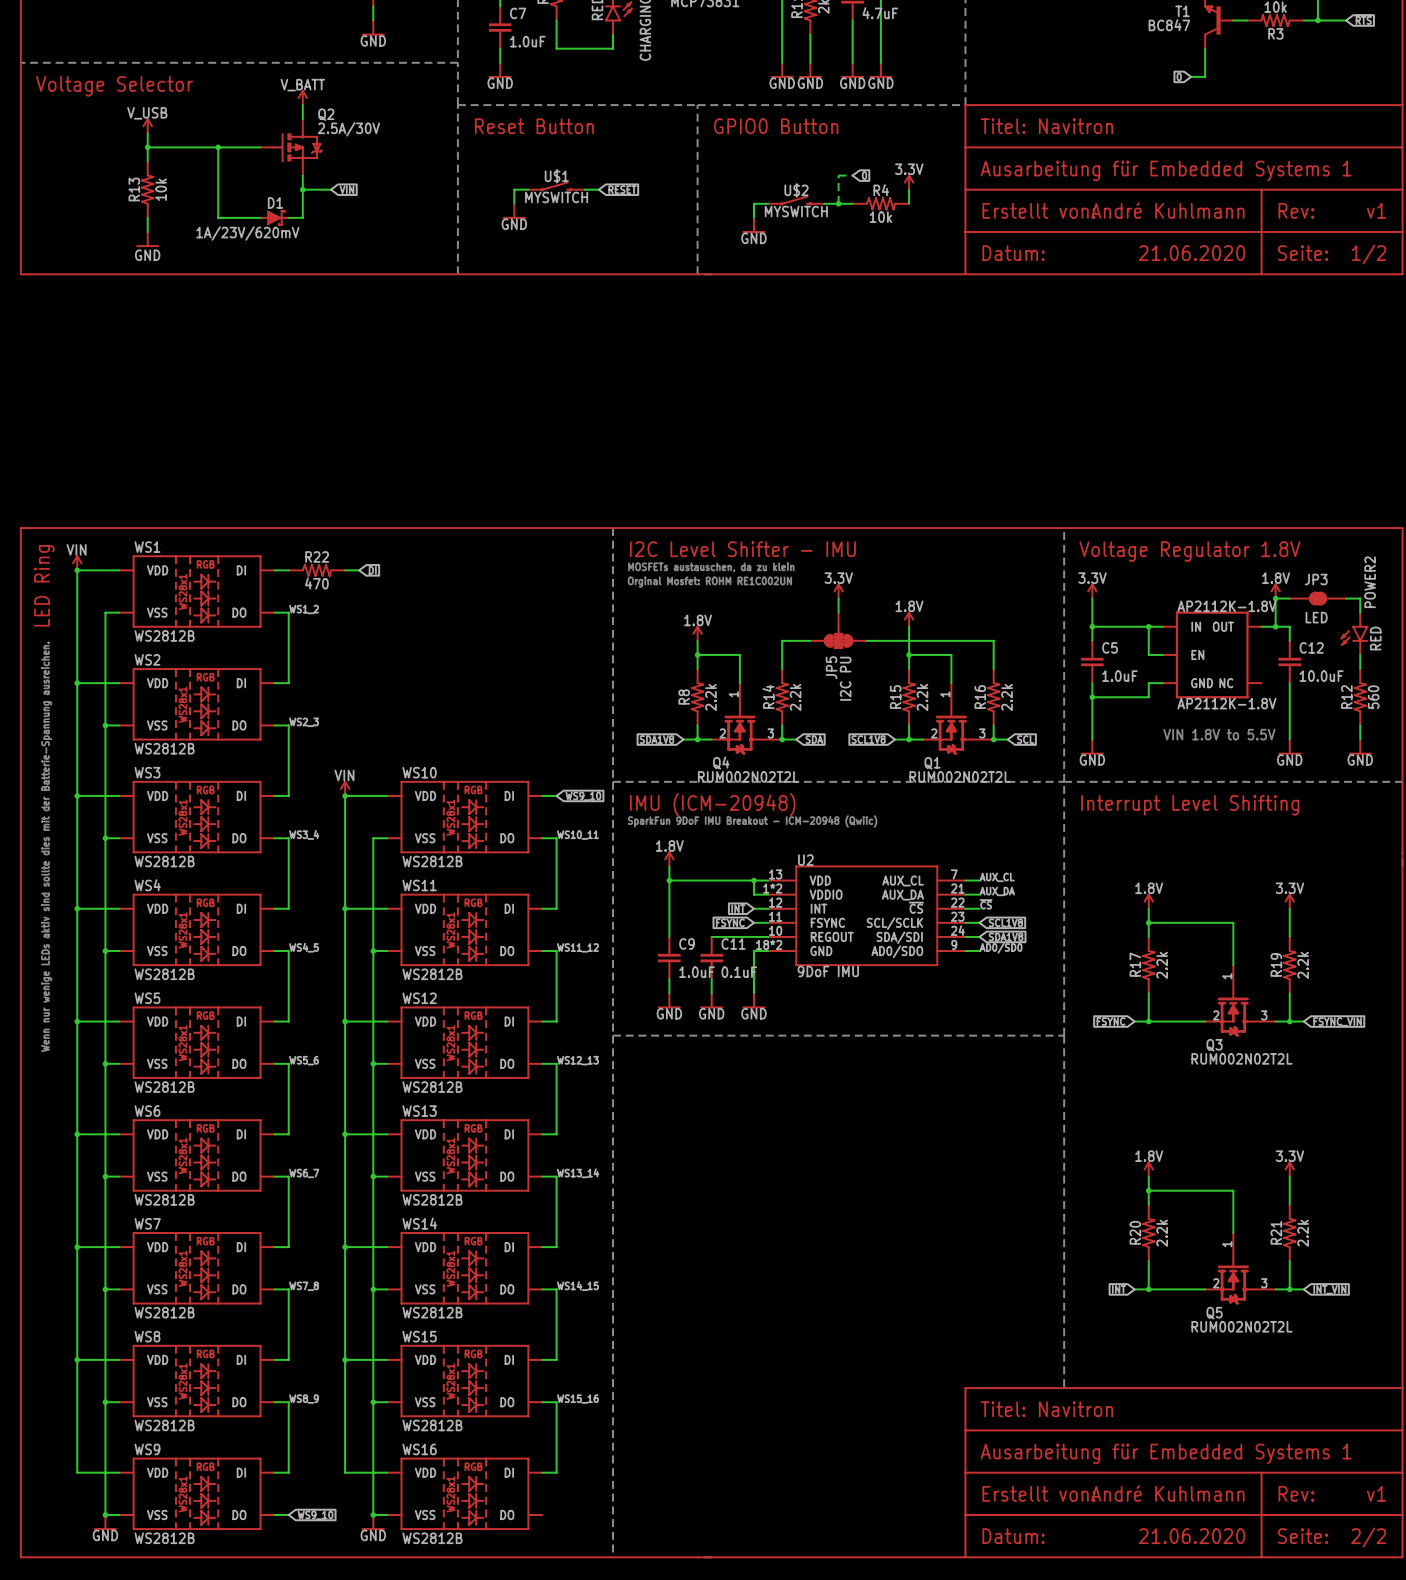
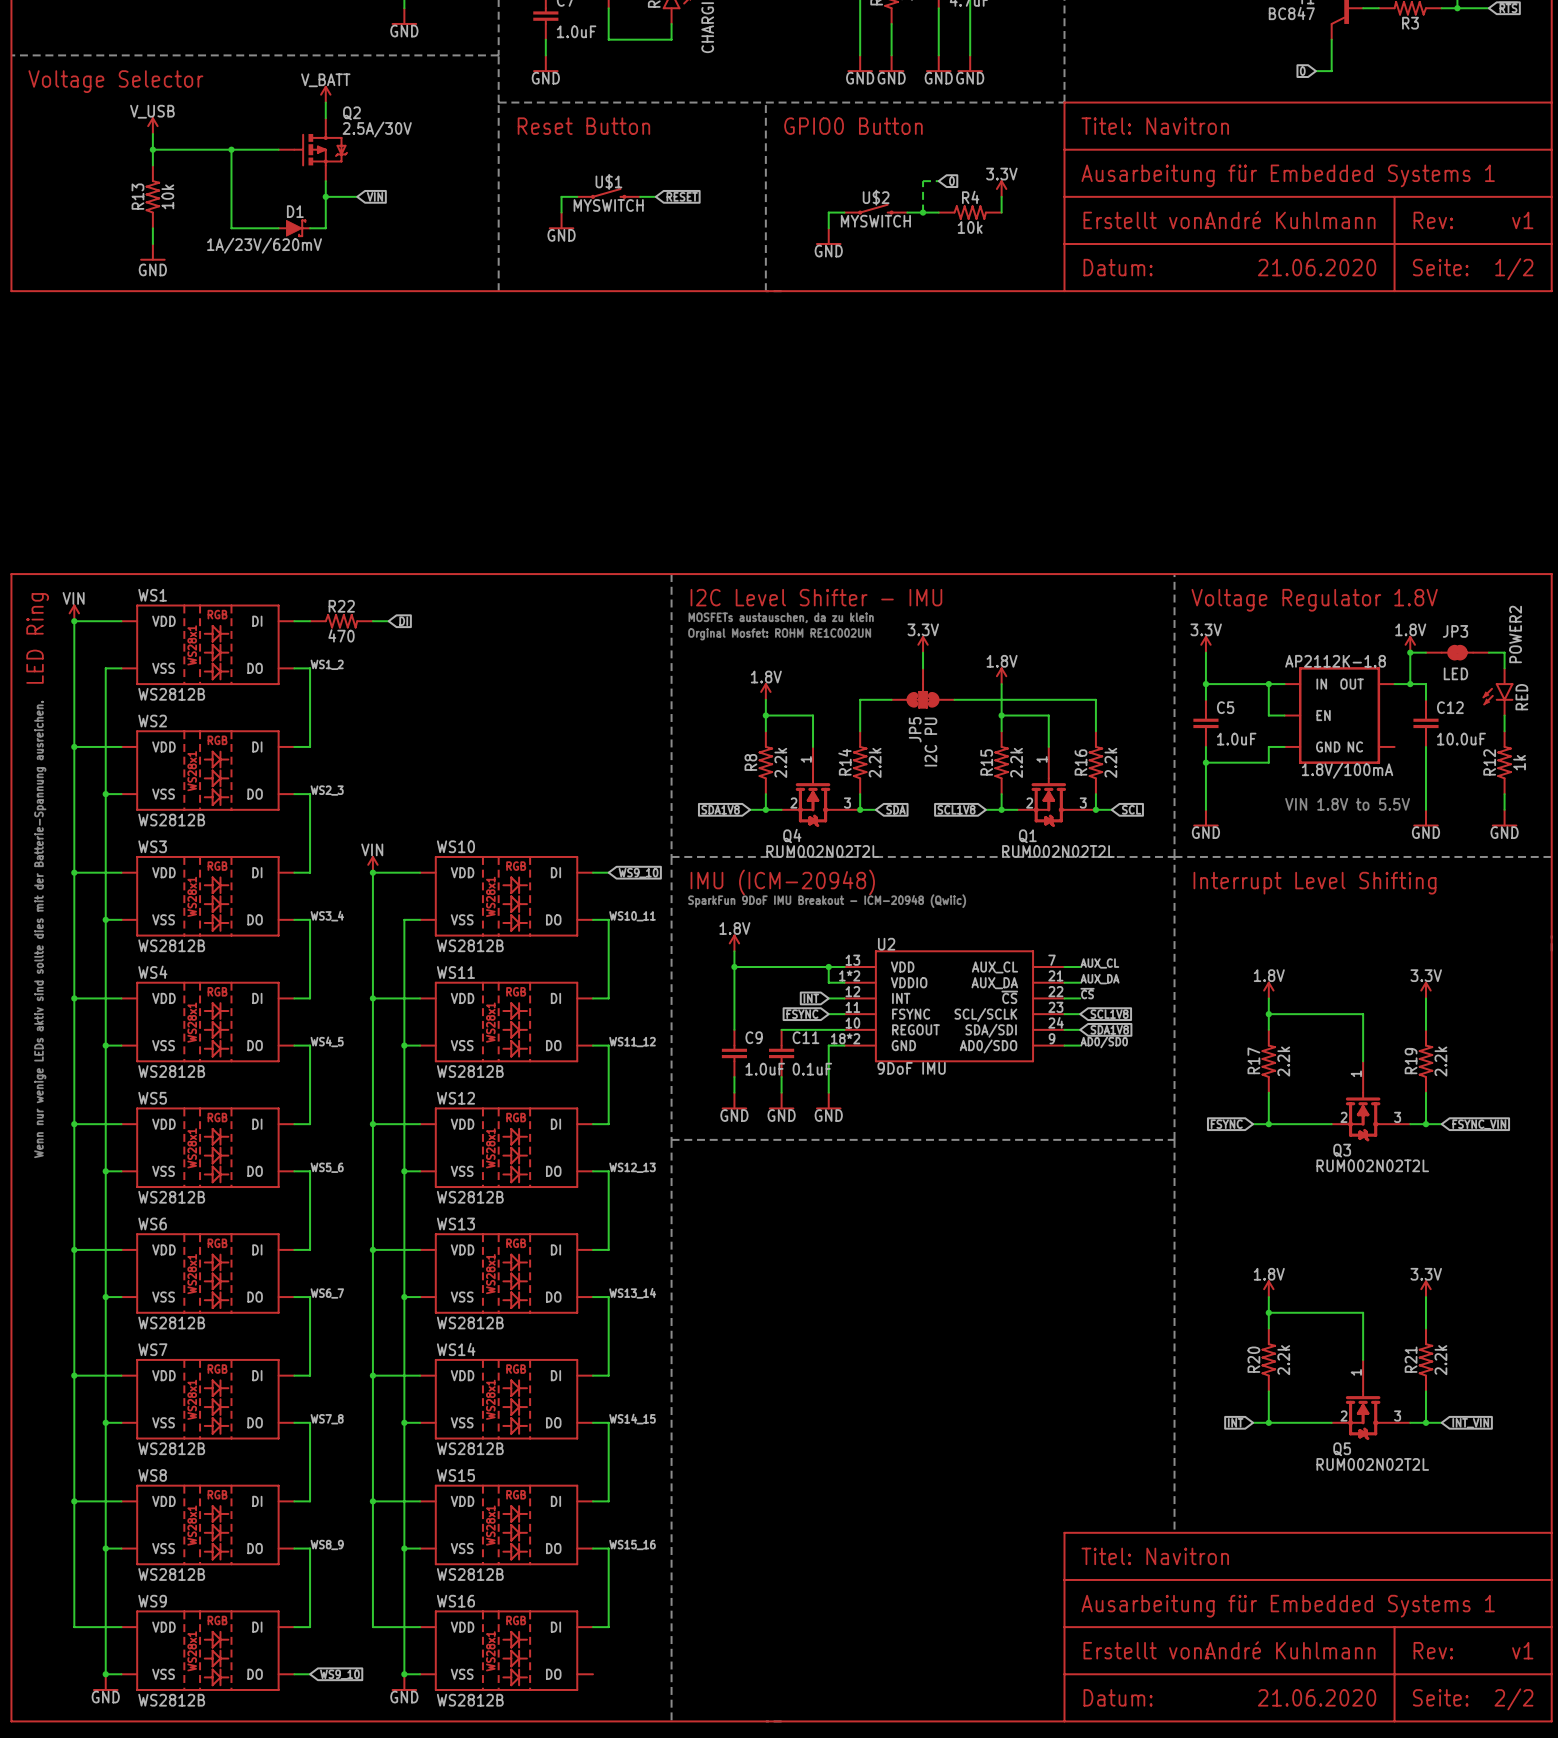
AP2112K-1.8V name: AP2112K-1.8V (1226, 606) -> AP2112K-1.8 (1335, 661)
R12 value: 560 (1373, 697) -> 1k (1519, 762)
AP2112K-1.8V value: AP2112K-1.8V (1226, 703) -> 1.8V/100mA (1347, 770)

